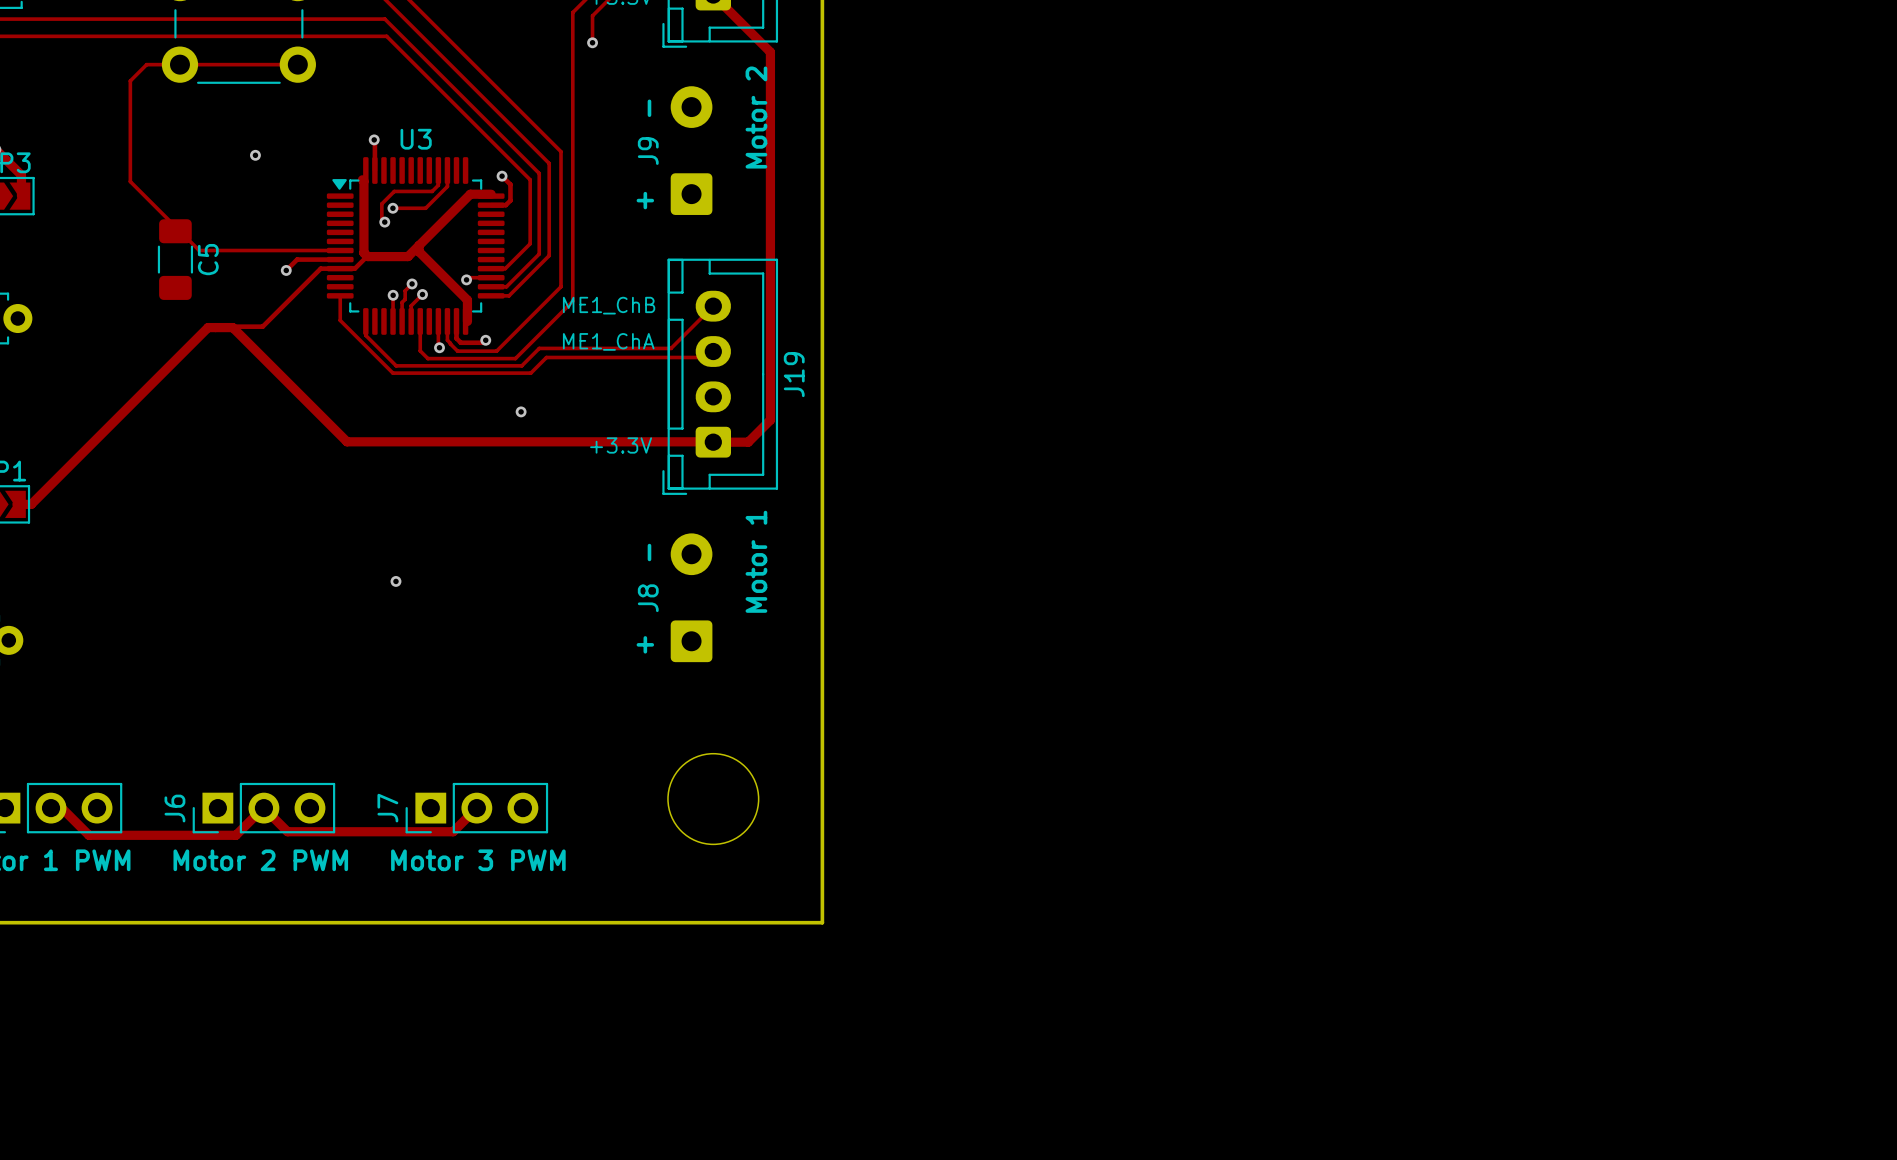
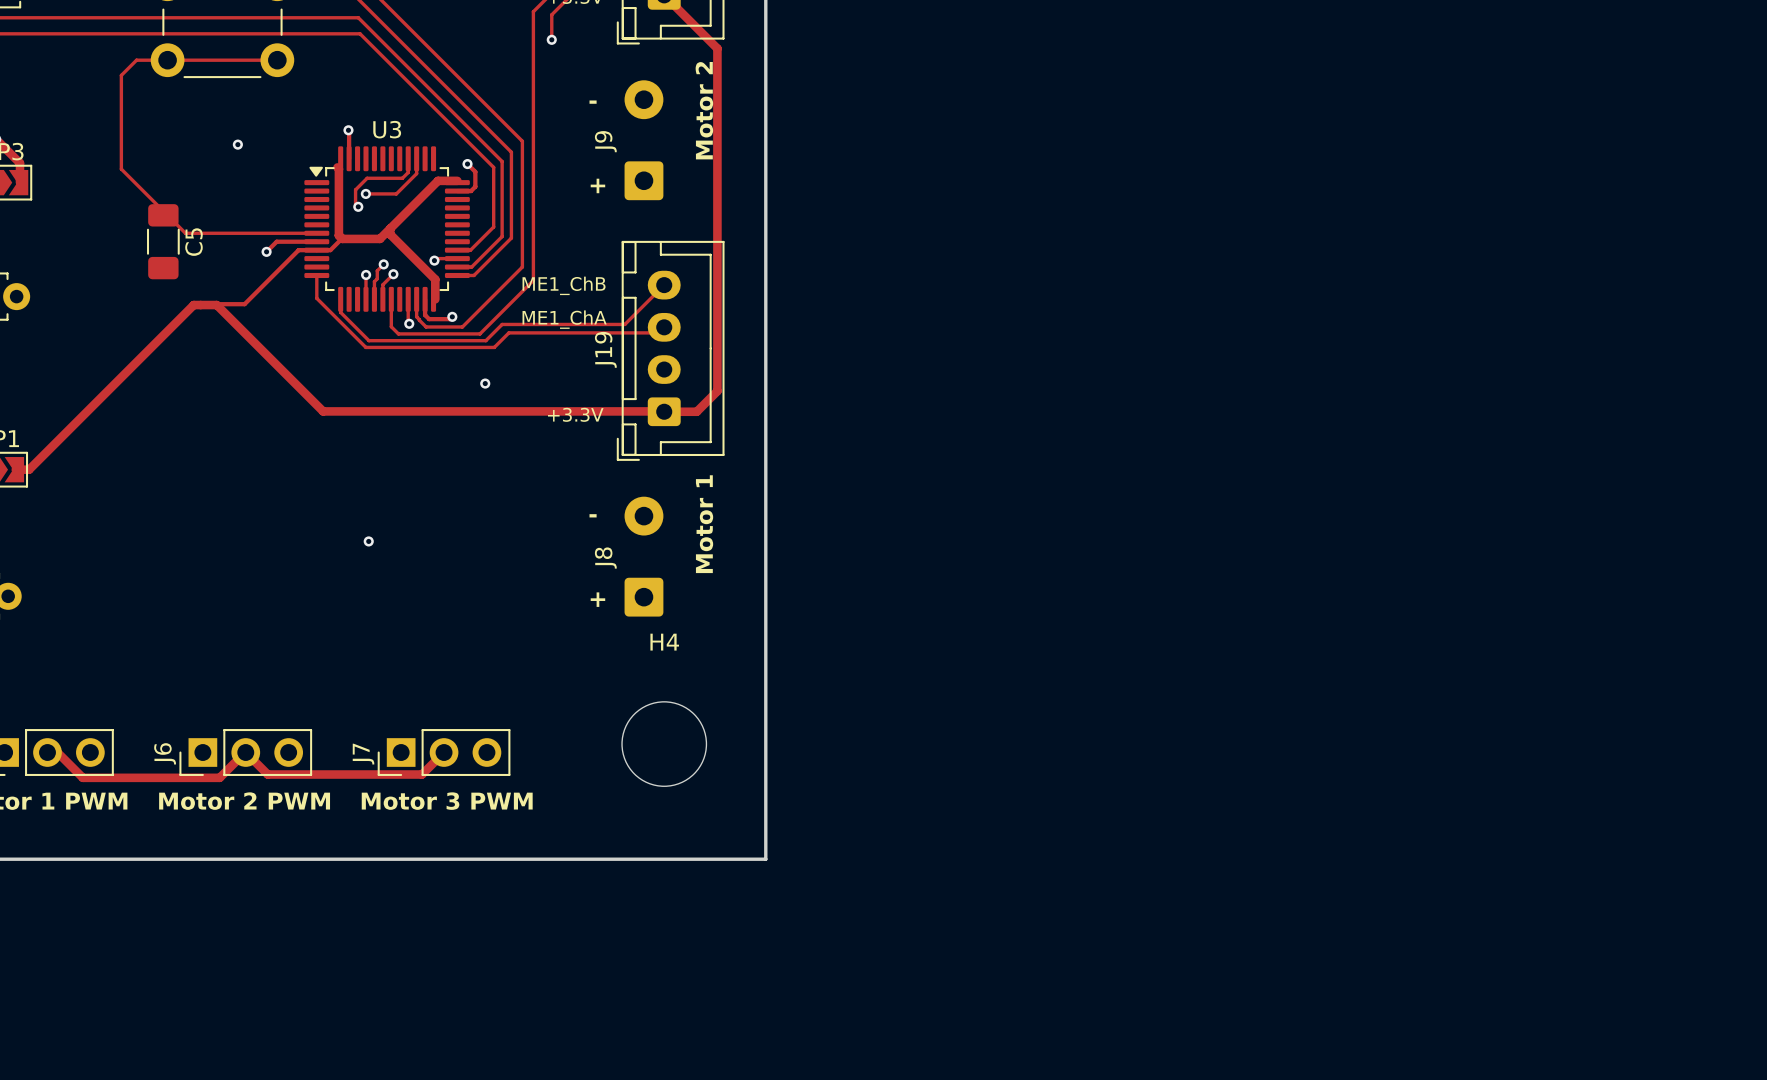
text rotation: 0° (649, 108) -> 90° clockwise (593, 102)
J19 name position: J19 (794, 374) -> J19 (605, 349)
text rotation: 0° (649, 552) -> 90° clockwise (593, 515)
H4 name: none -> H4 (664, 642)

